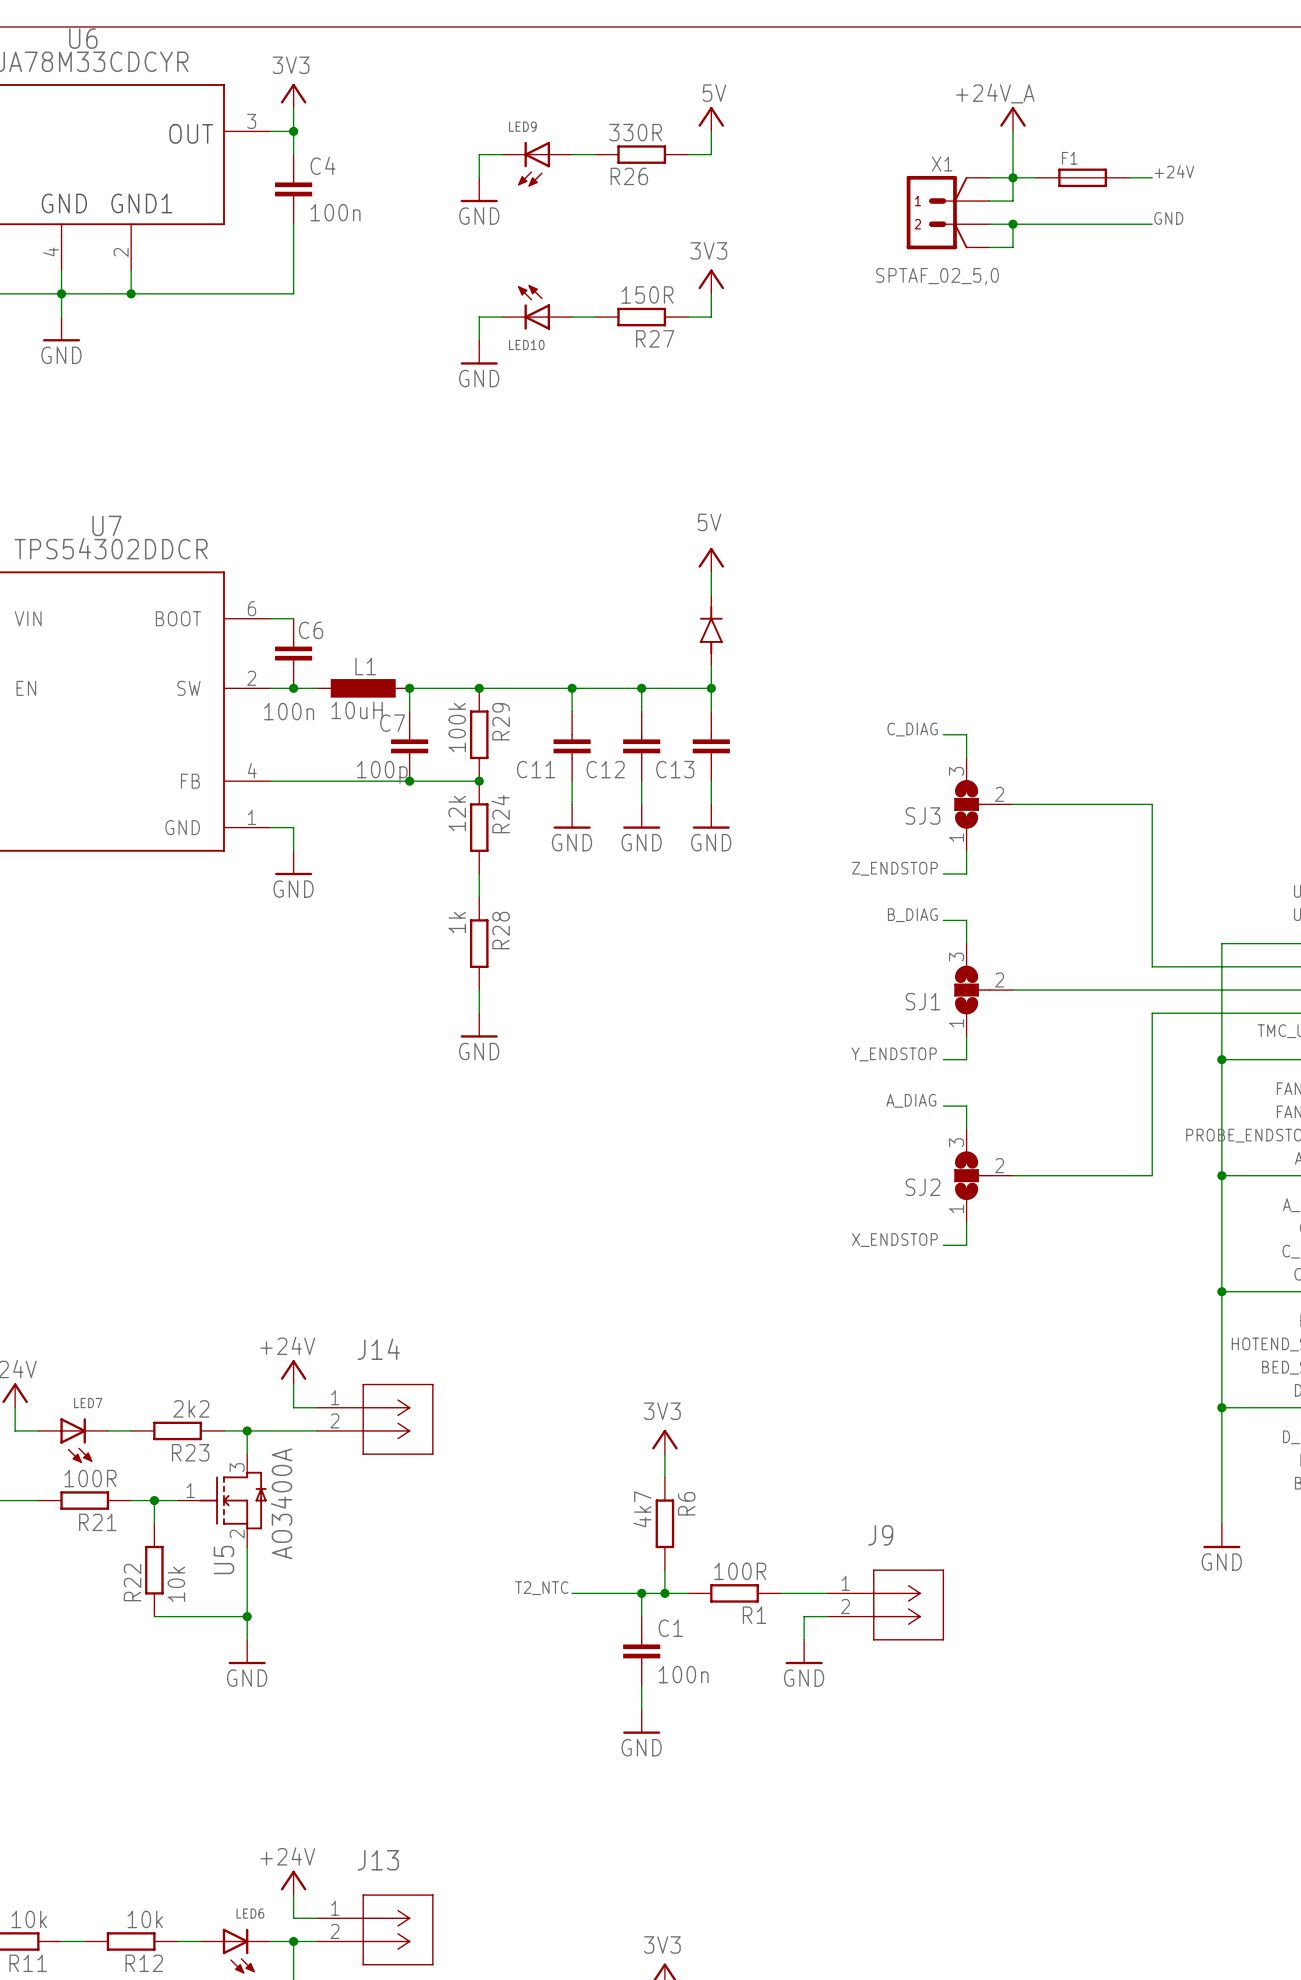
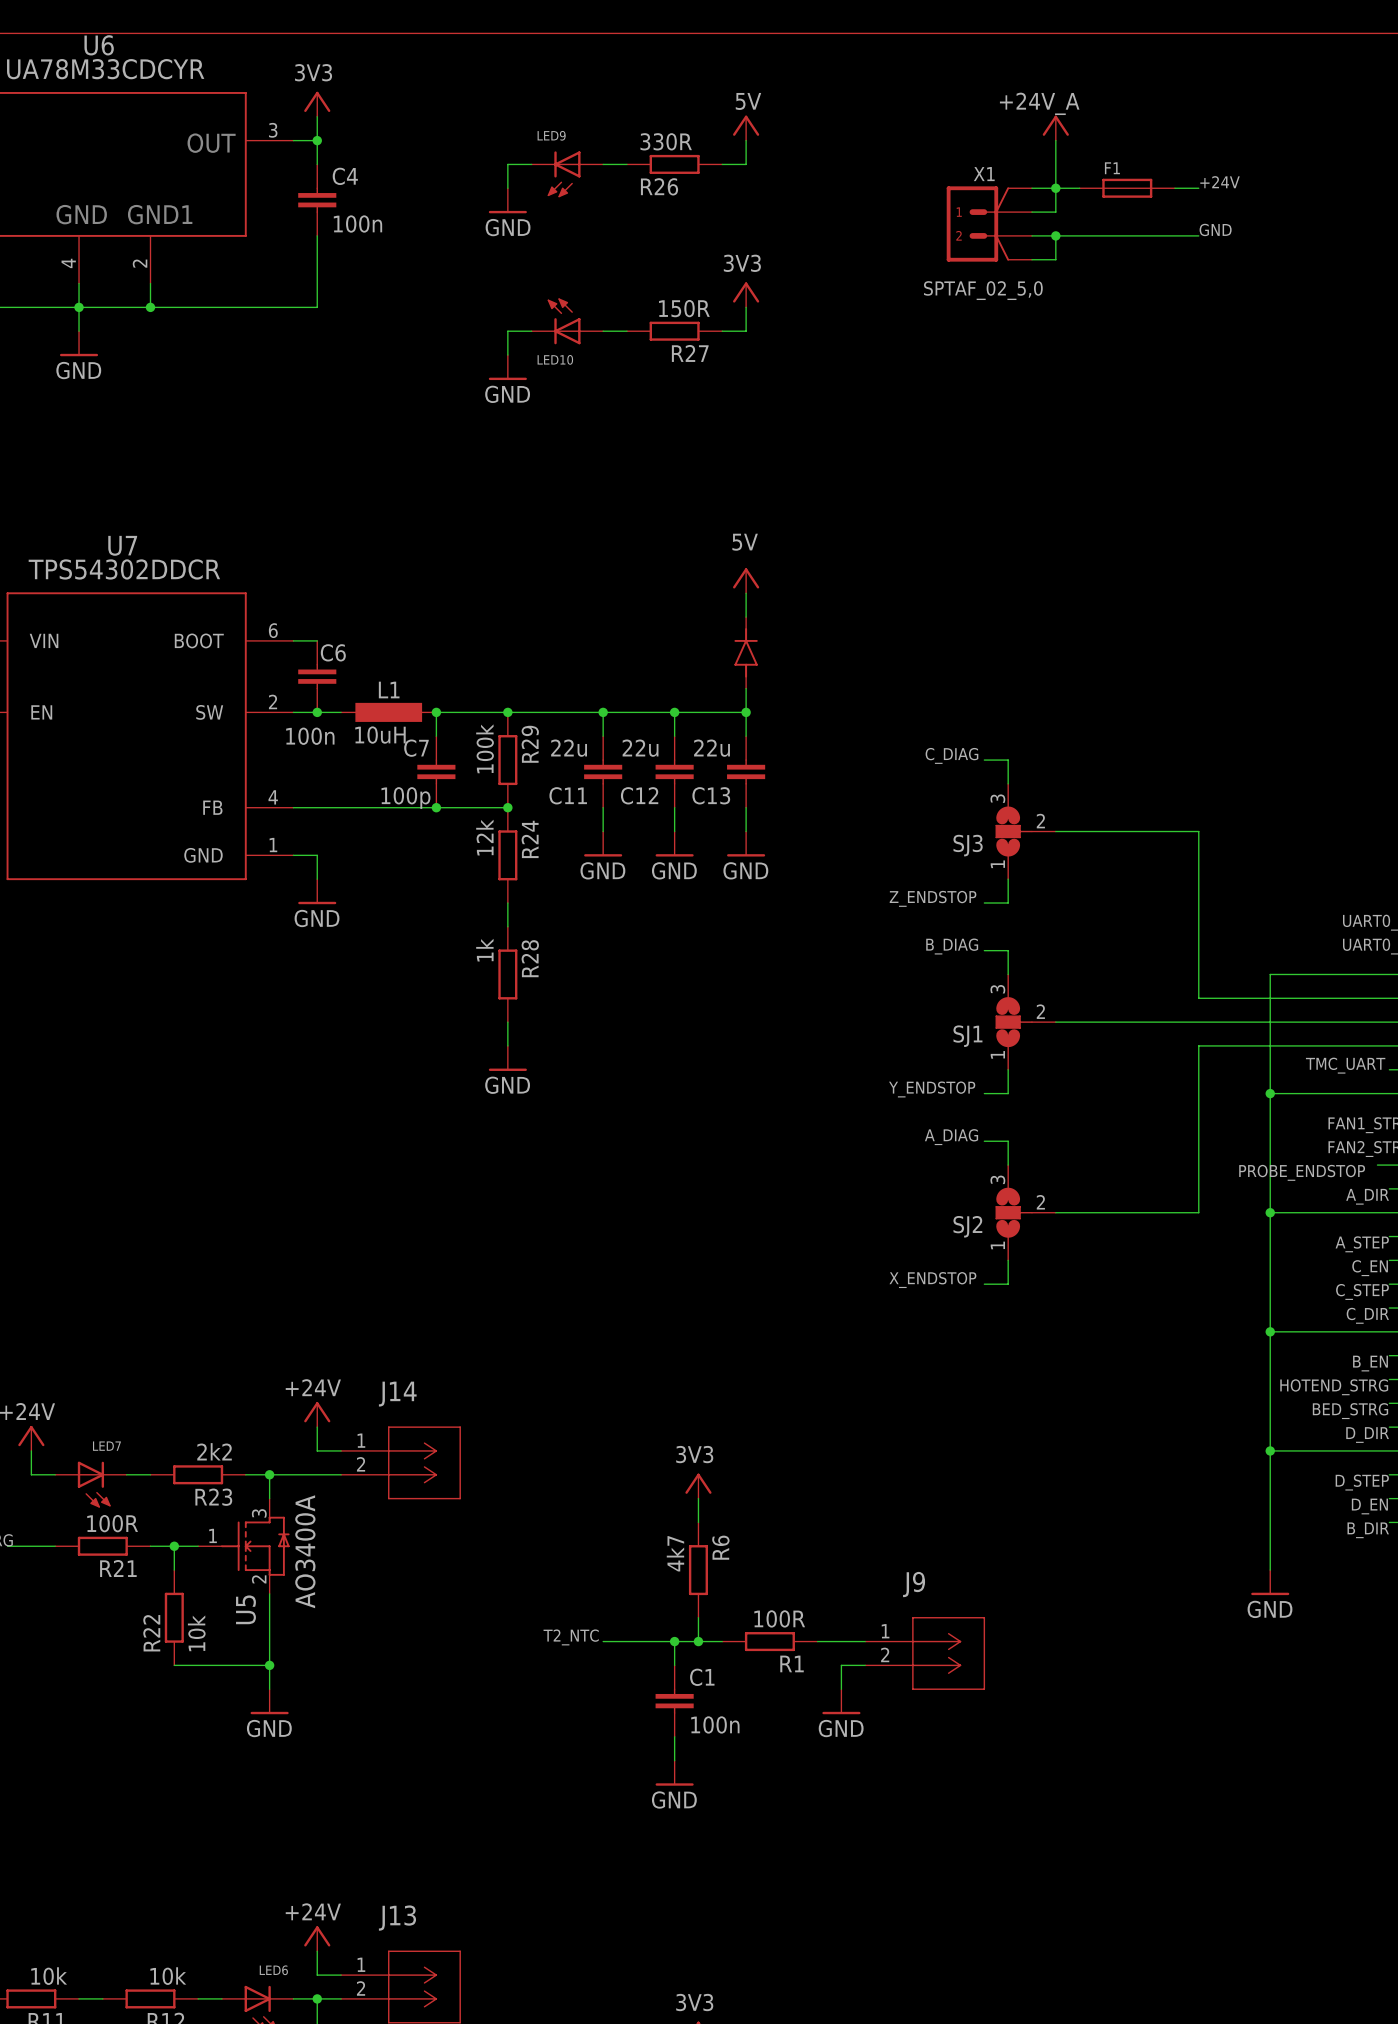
C11 value: none -> 22u (569, 748)
C12 value: none -> 22u (640, 748)
C13 value: none -> 22u (712, 748)

